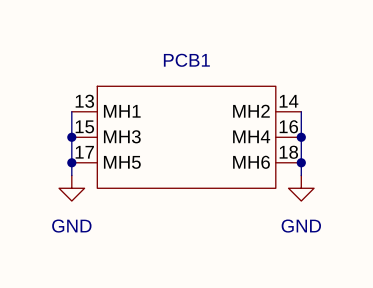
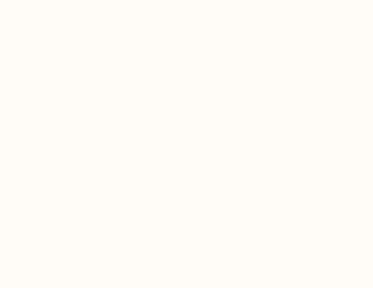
wire: (71, 111) (71, 175) -> none
wire: (301, 111) (301, 175) -> none
junction: (71, 137) -> none
PCB1: (186, 137) -> none
junction: (301, 137) -> none
junction: (71, 162) -> none
junction: (301, 162) -> none
power symbol: GND (71, 188) -> none
power symbol: GND (301, 188) -> none

